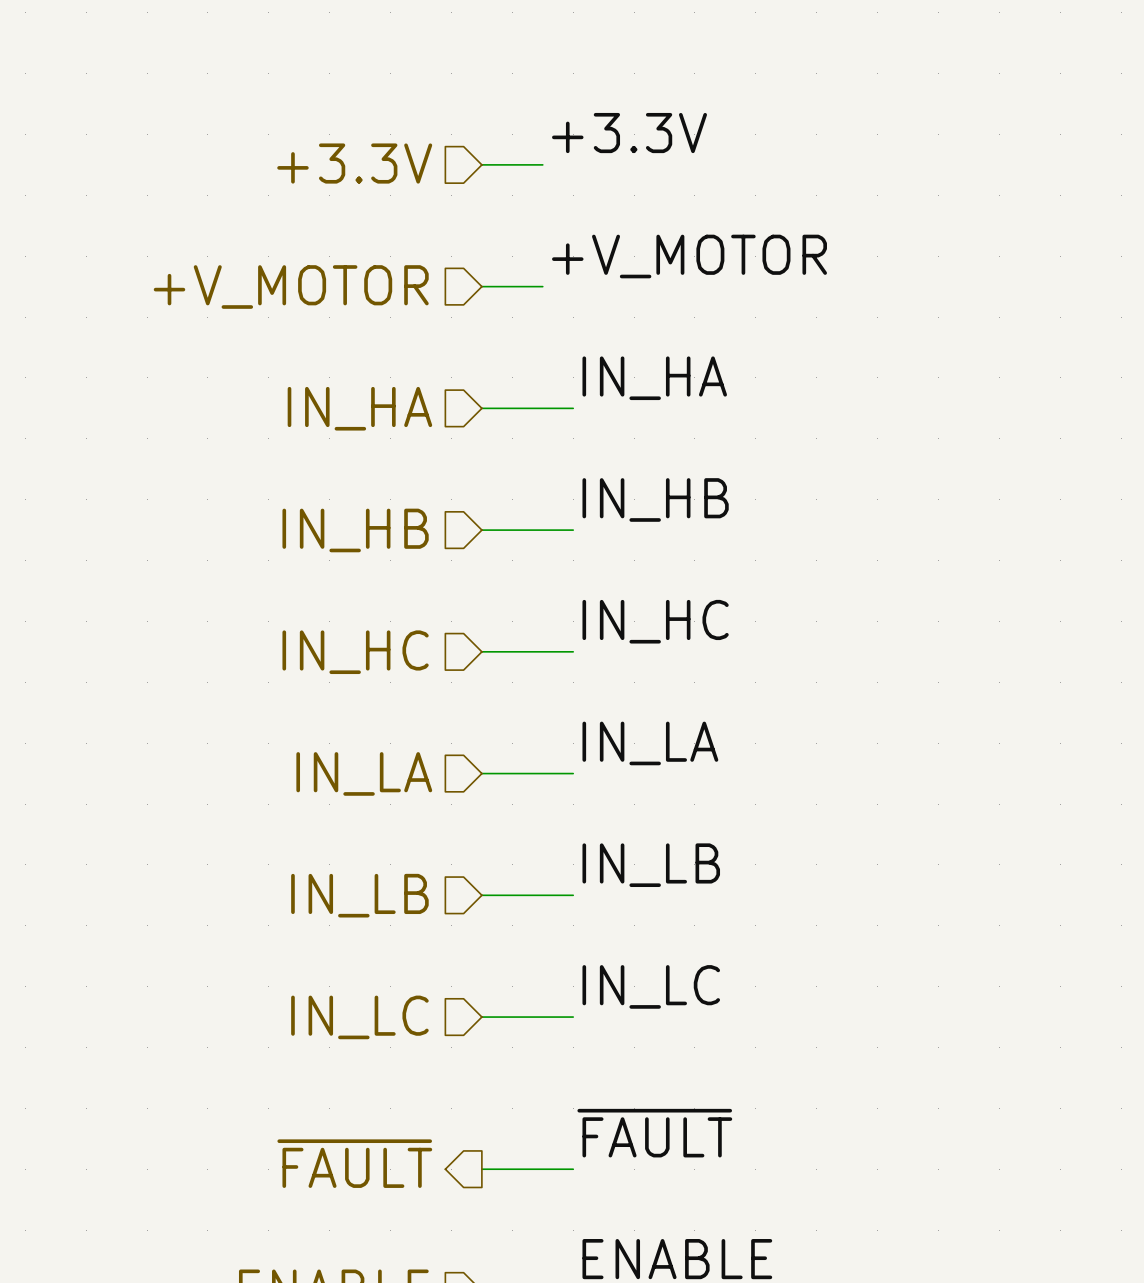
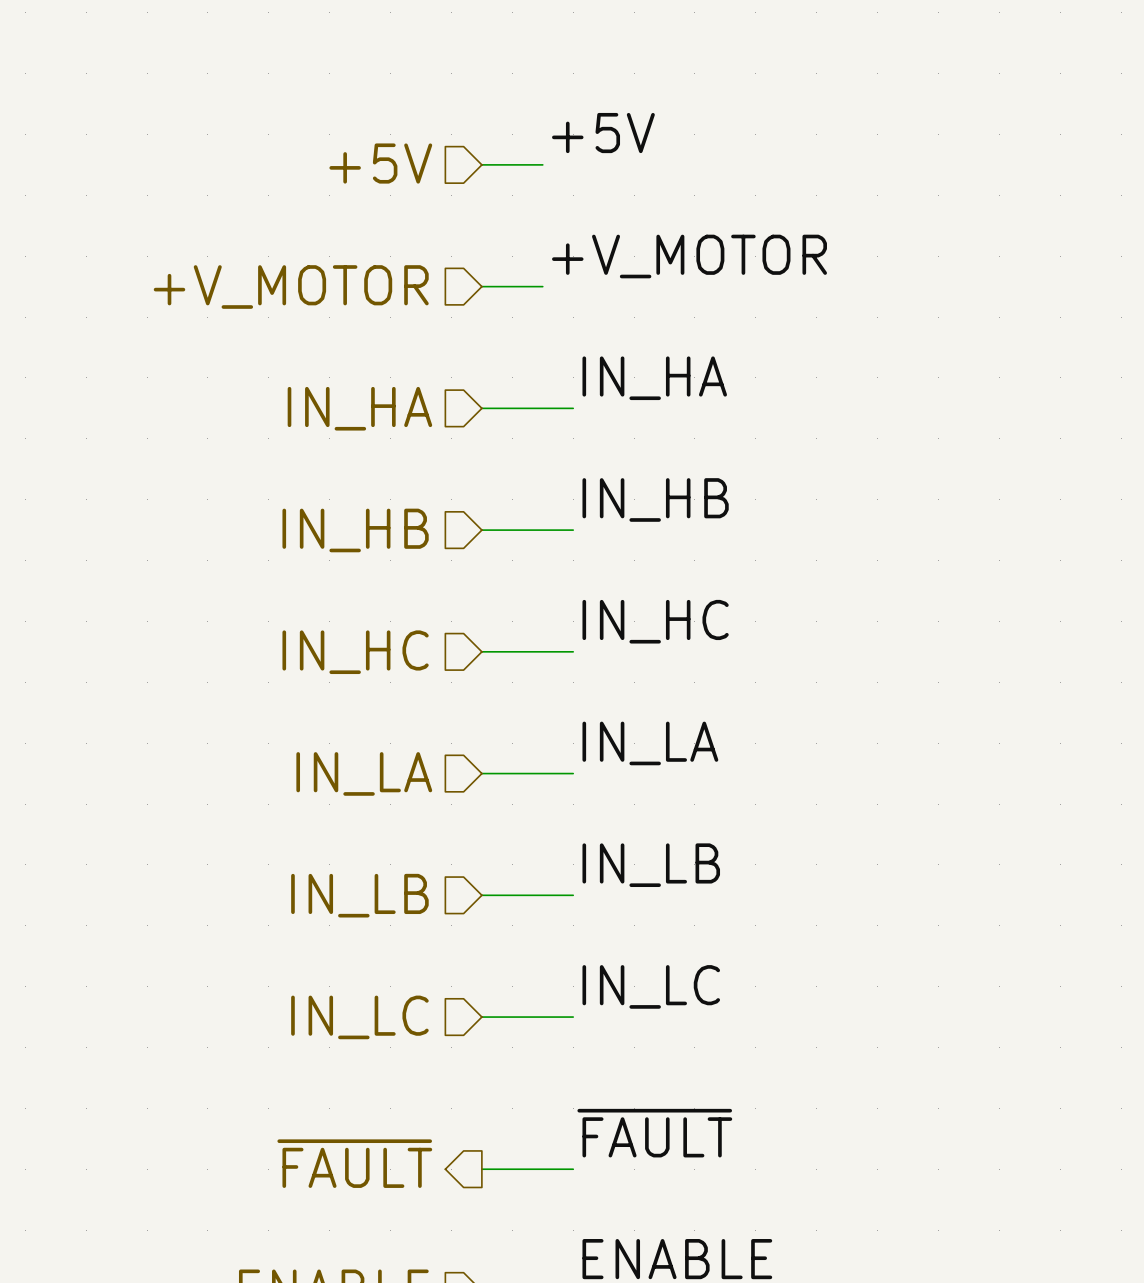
label: +3.3V (629, 133) -> +5V (603, 133)
hierarchical label: +3.3V (354, 163) -> +5V (380, 163)

